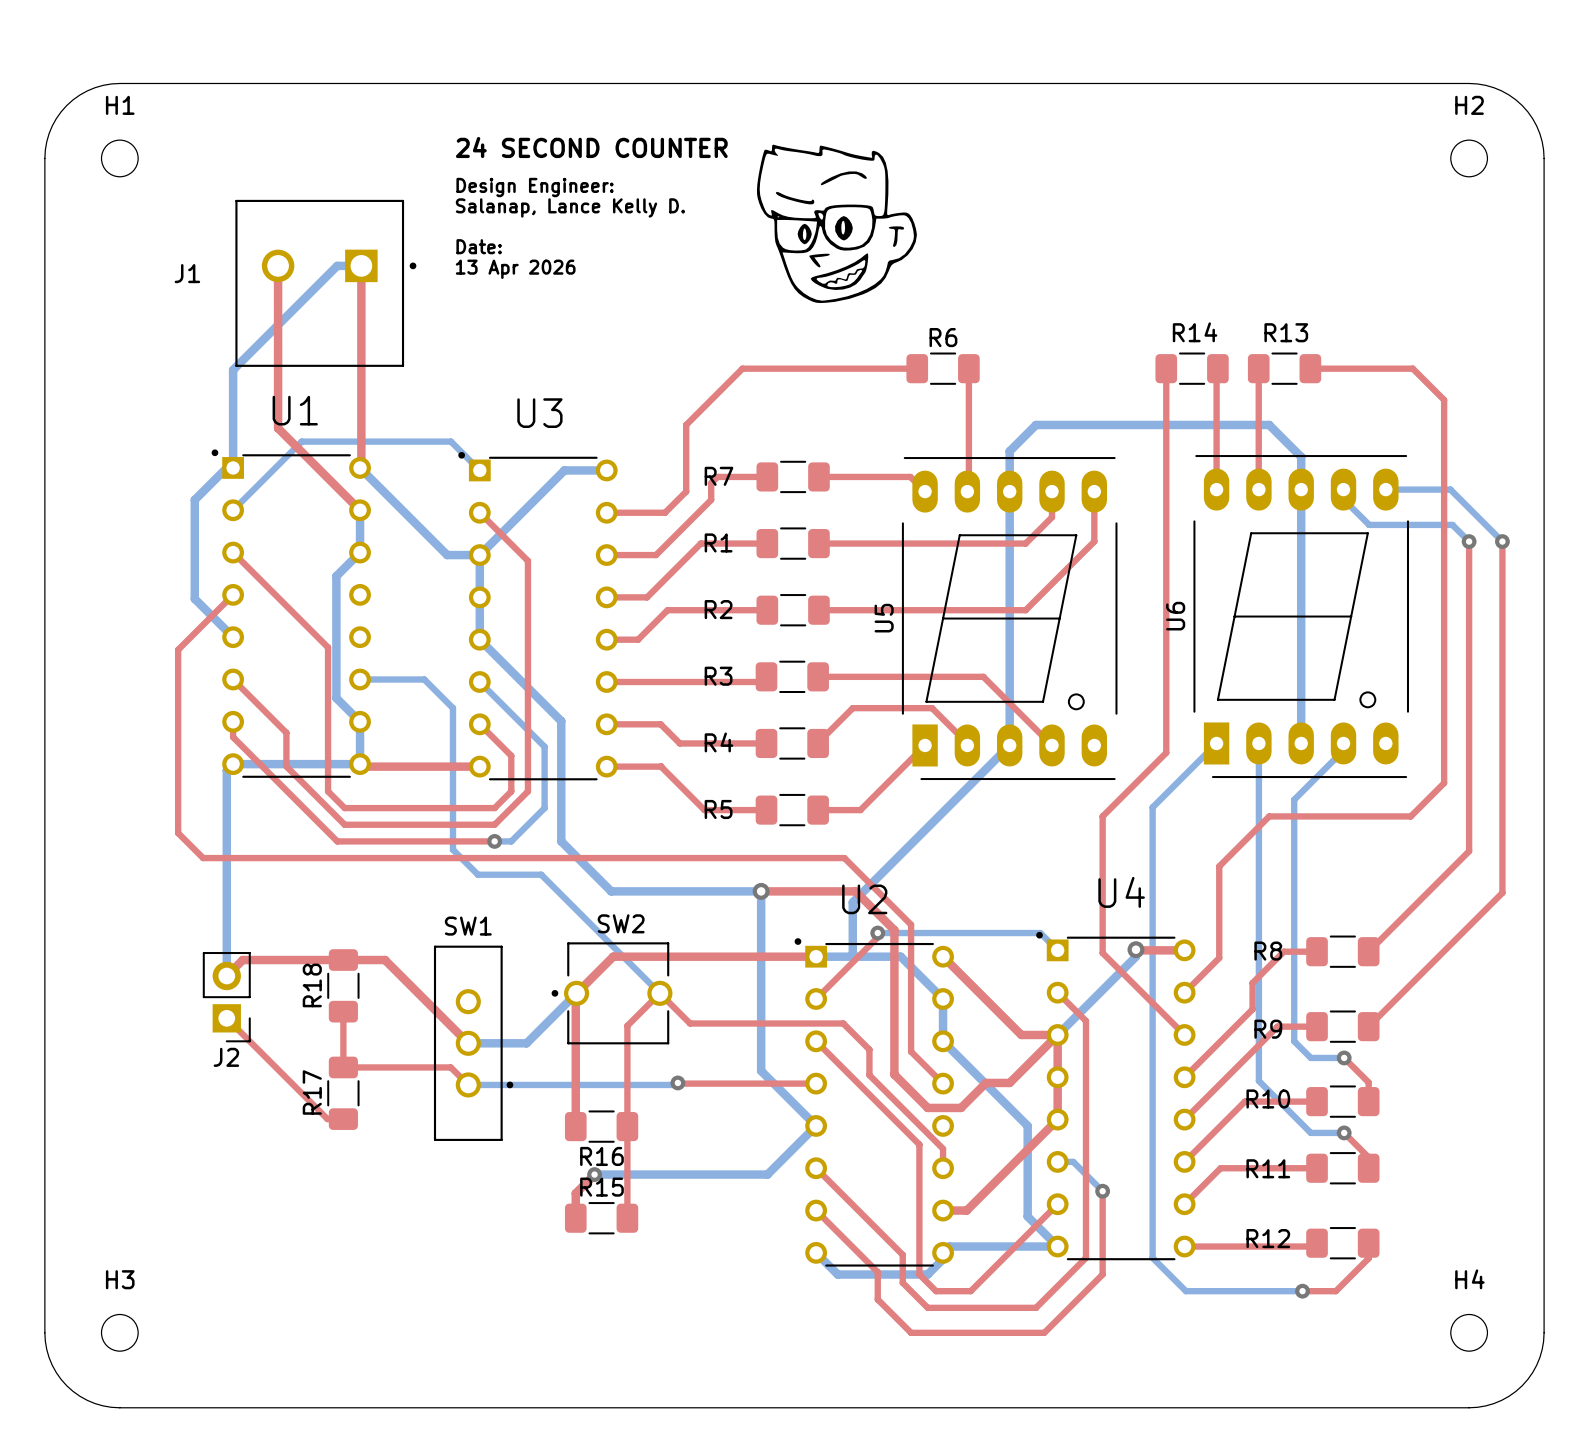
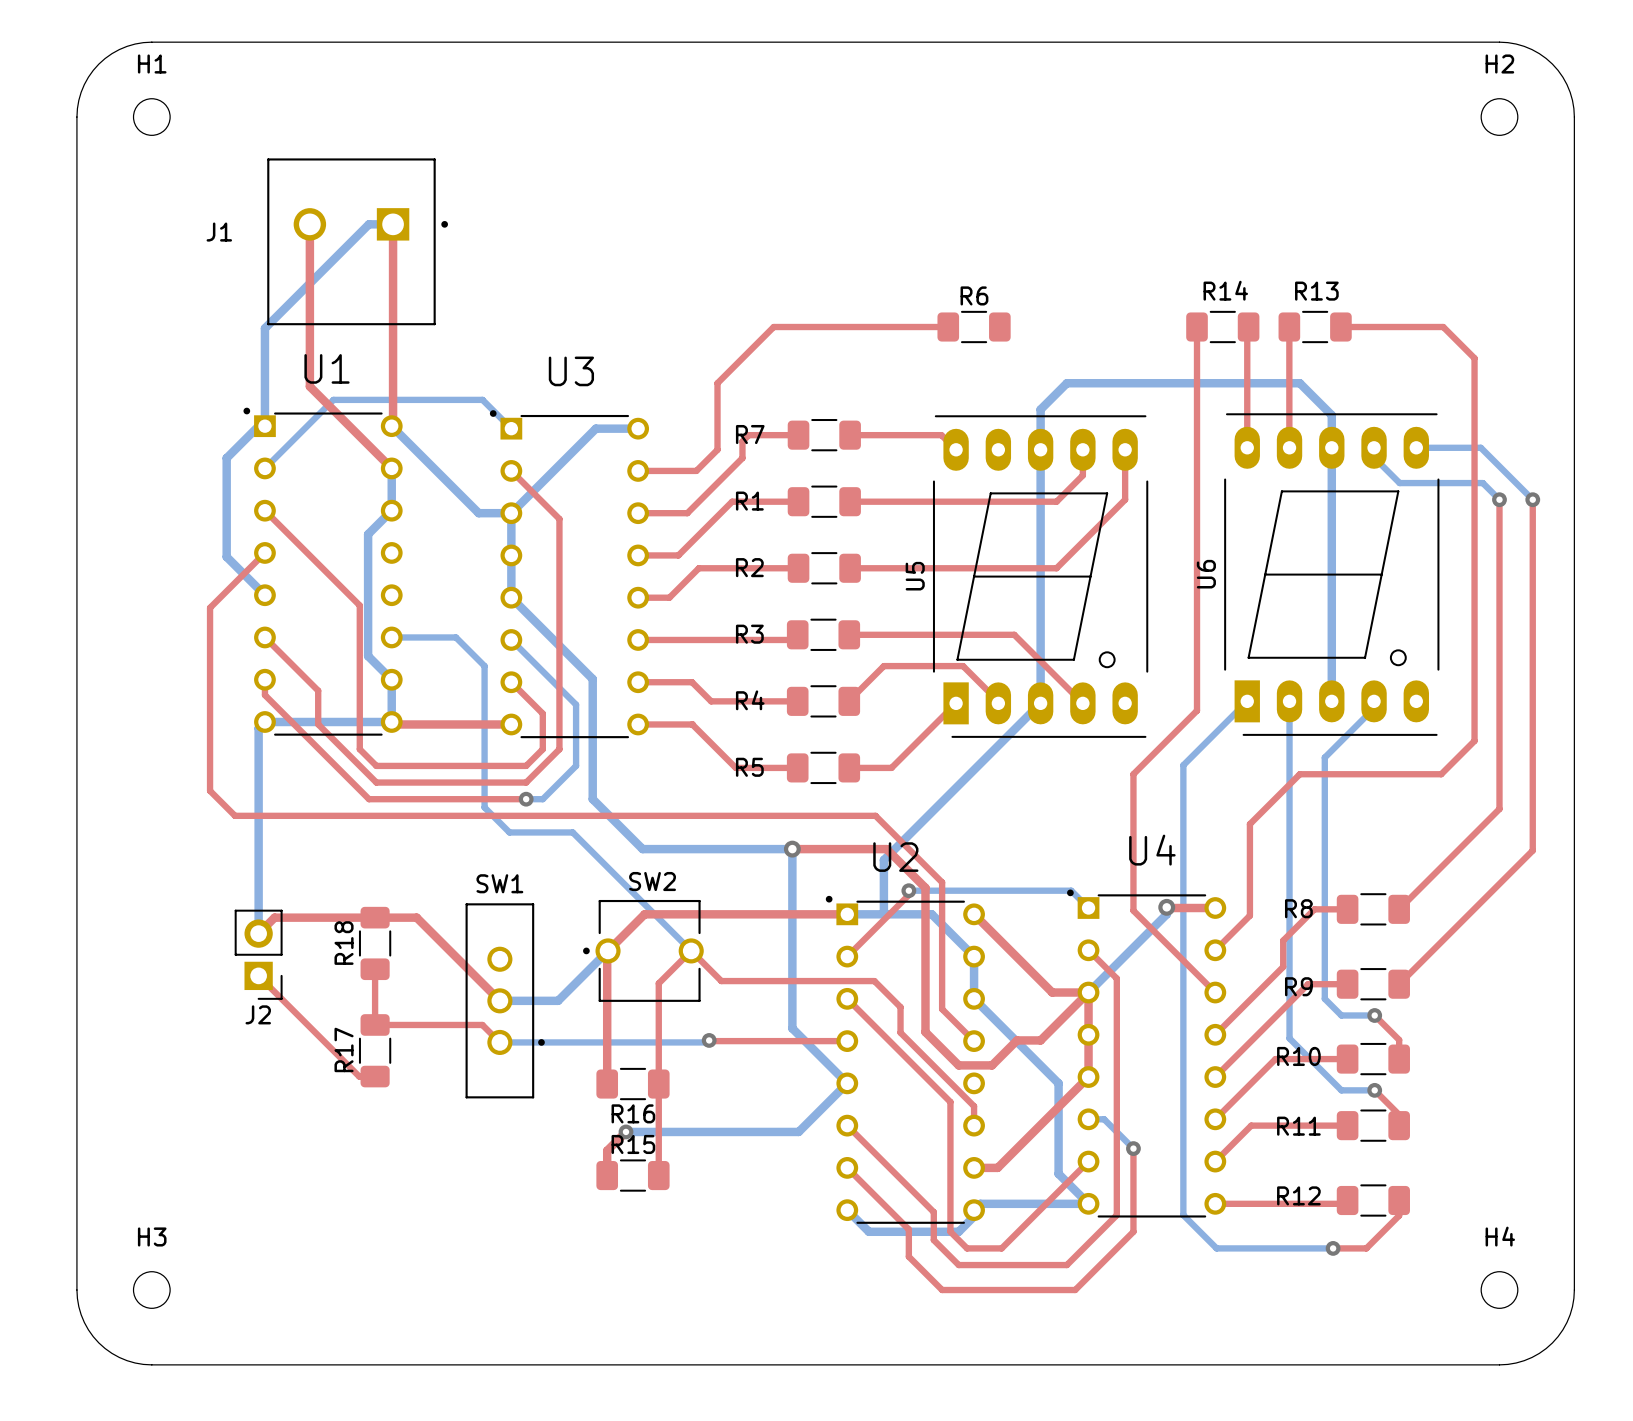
drawing: [756, 144, 917, 304] -> none
text: 24 SECOND COUNTER (591, 147) -> none
text: Design Engineer: (535, 187) -> none
text: Salanap, Lance Kelly D. (570, 207) -> none
text: Date: (479, 246) -> none
text: 13 Apr 2026 (515, 269) -> none
top track: (968, 368) (967, 491) -> none

